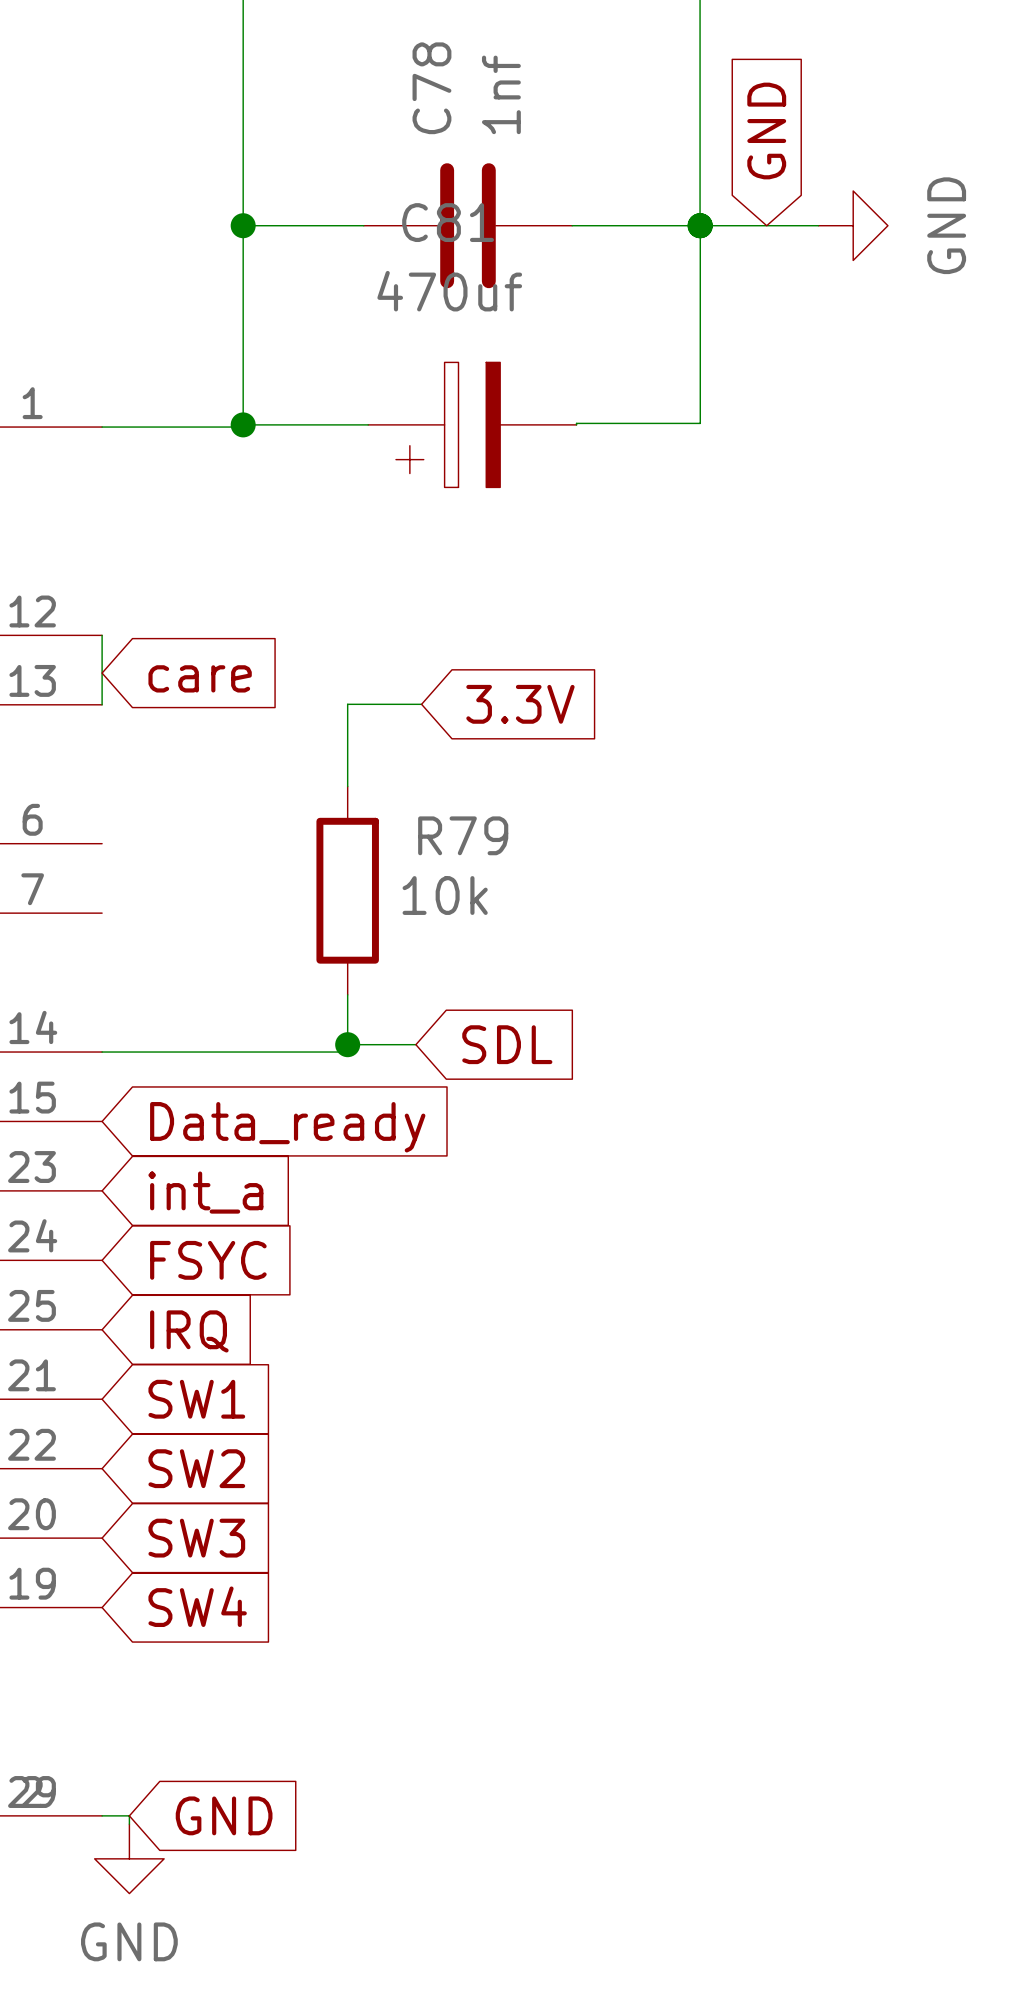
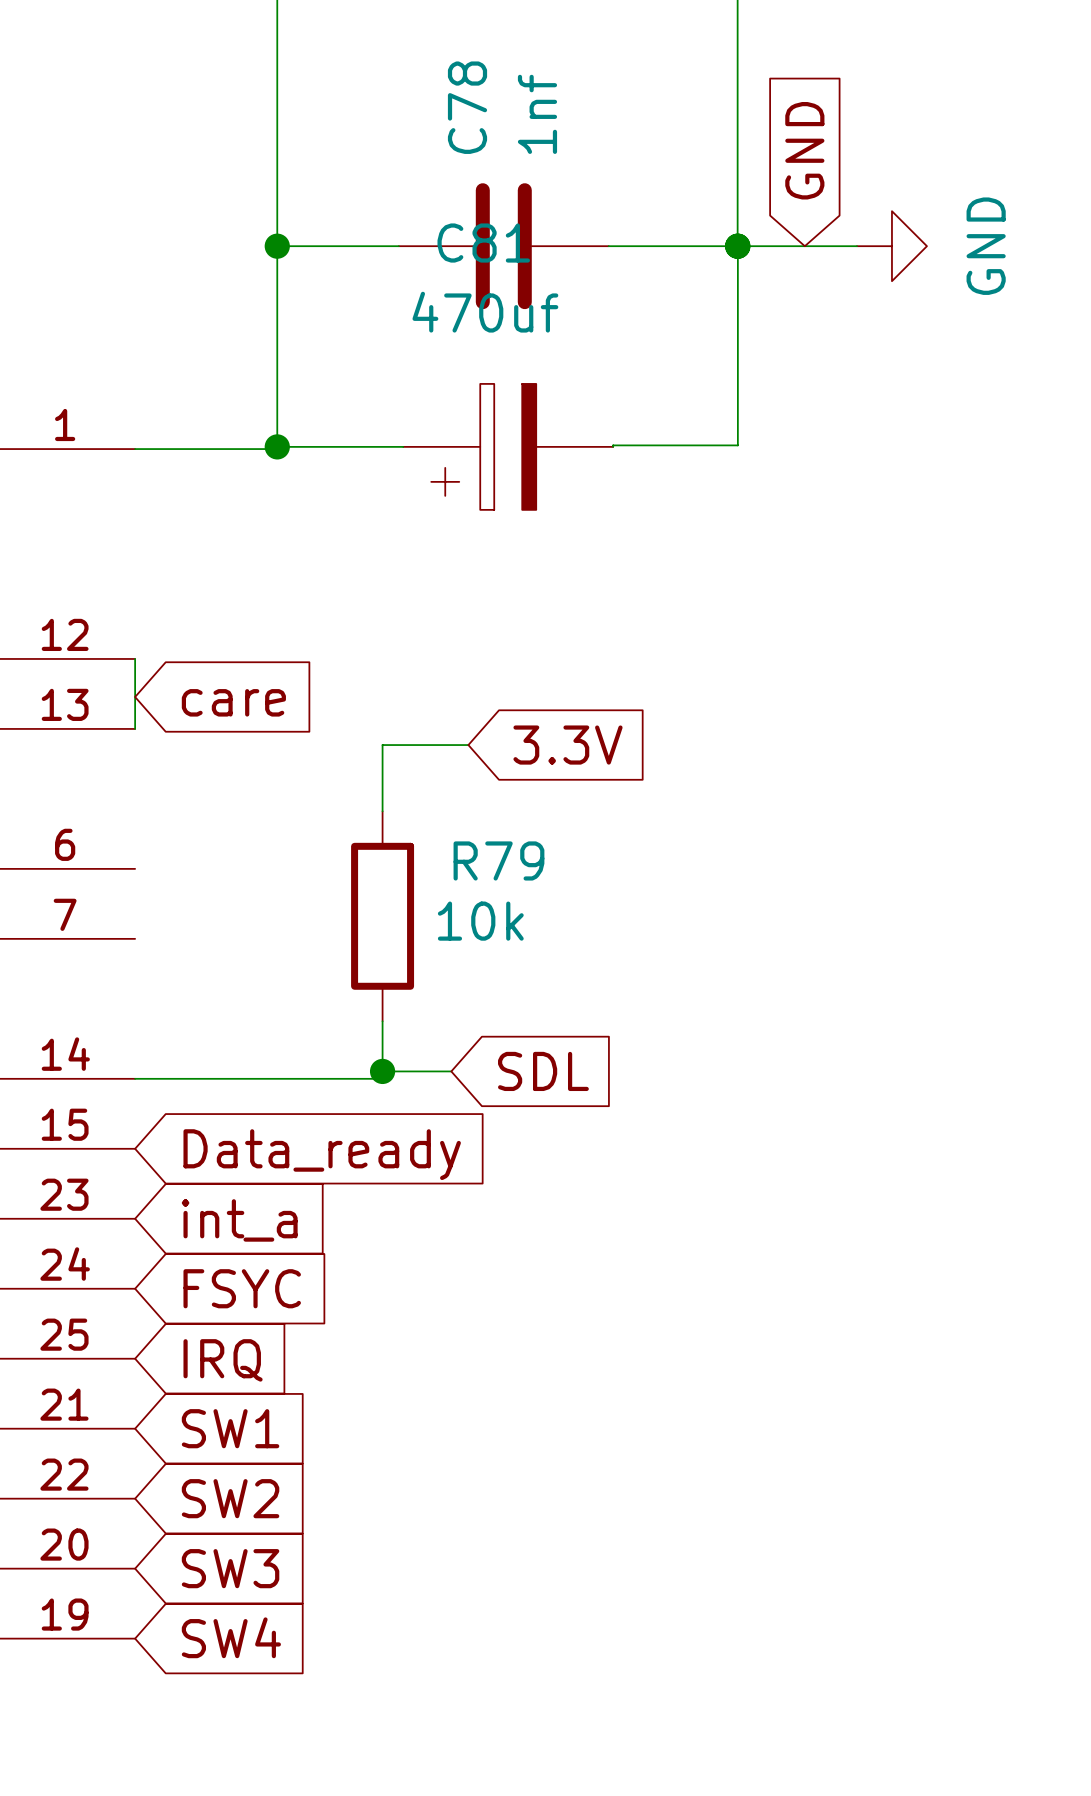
wire: (421, 704) (347, 704) (347, 720) -> (468, 745) (382, 745)
global label position: 3.3V (520, 704) -> 3.3V (568, 745)

